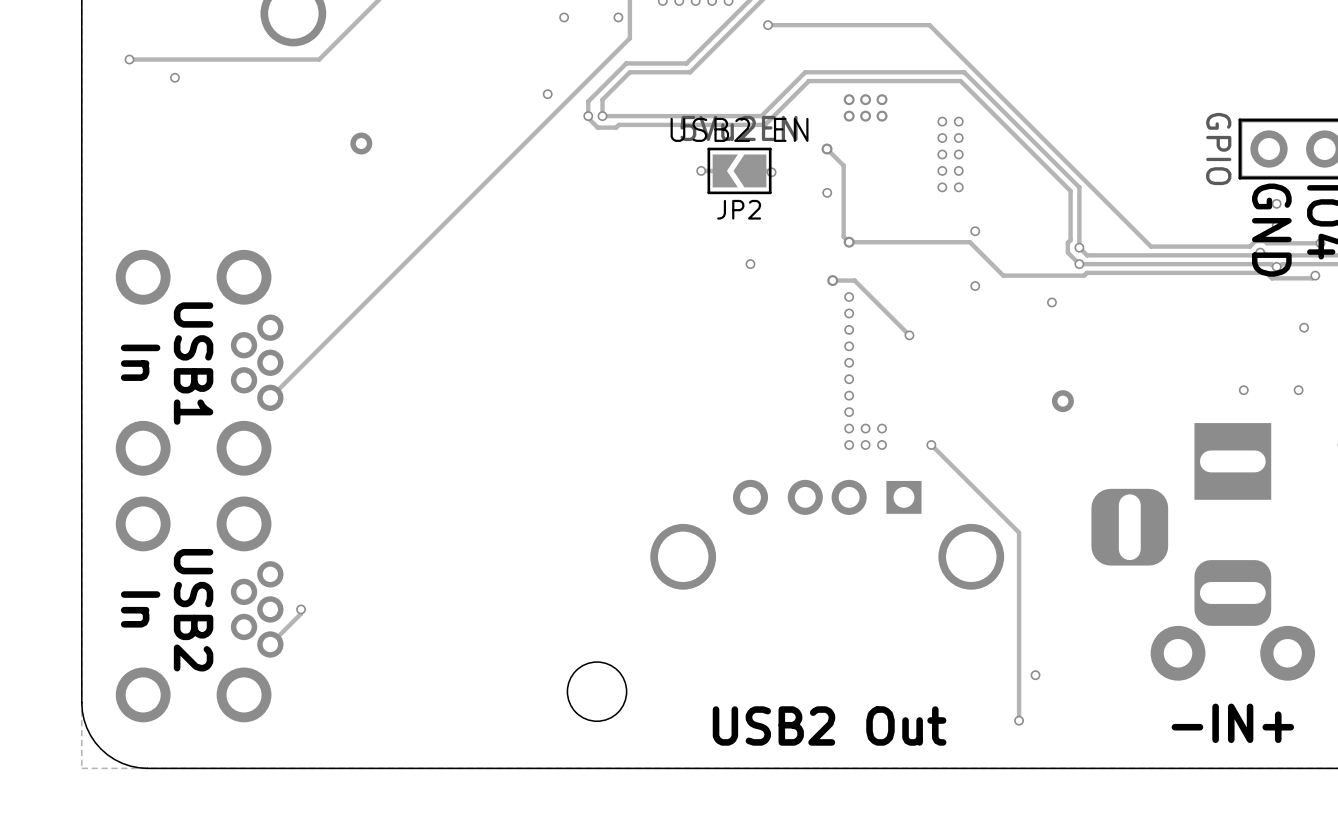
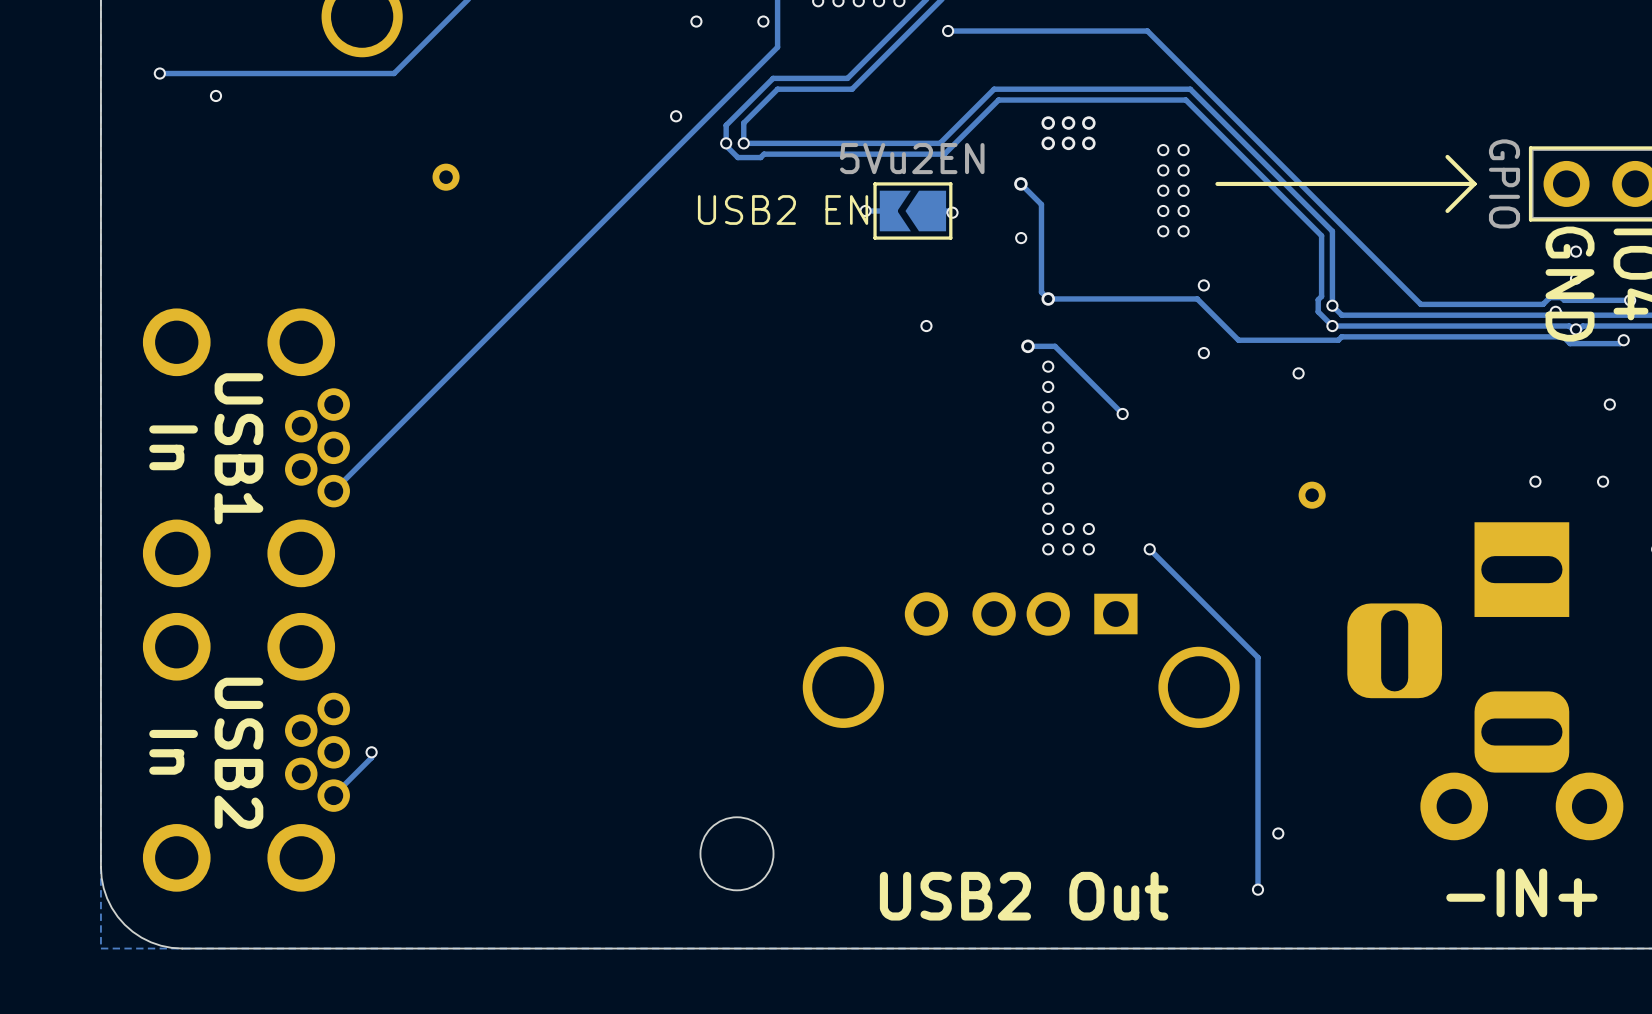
line: none -> (1447, 156) (1474, 183)
text position: USB2 EN (739, 129) -> USB2 EN (783, 209)
line: none -> (1474, 183) (1217, 183)
line: none -> (1474, 183) (1447, 211)
JP2 name: JP2 (739, 209) -> none

